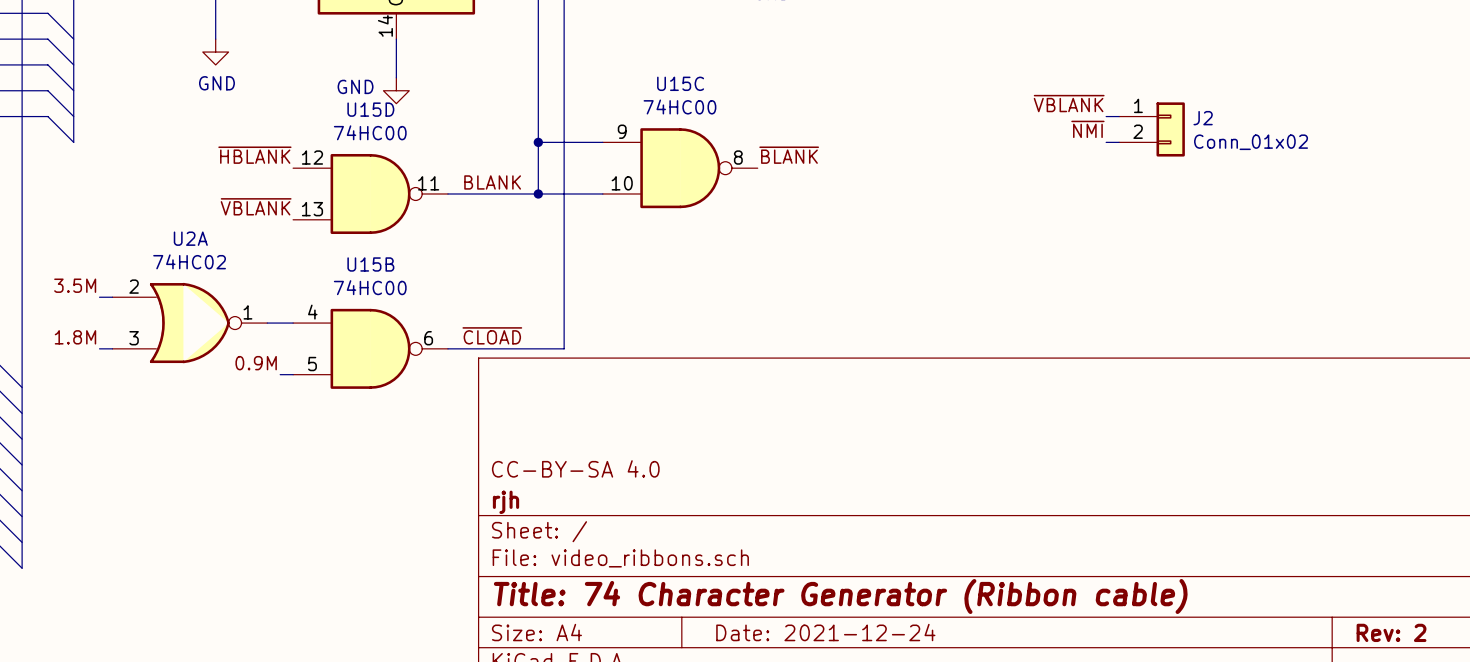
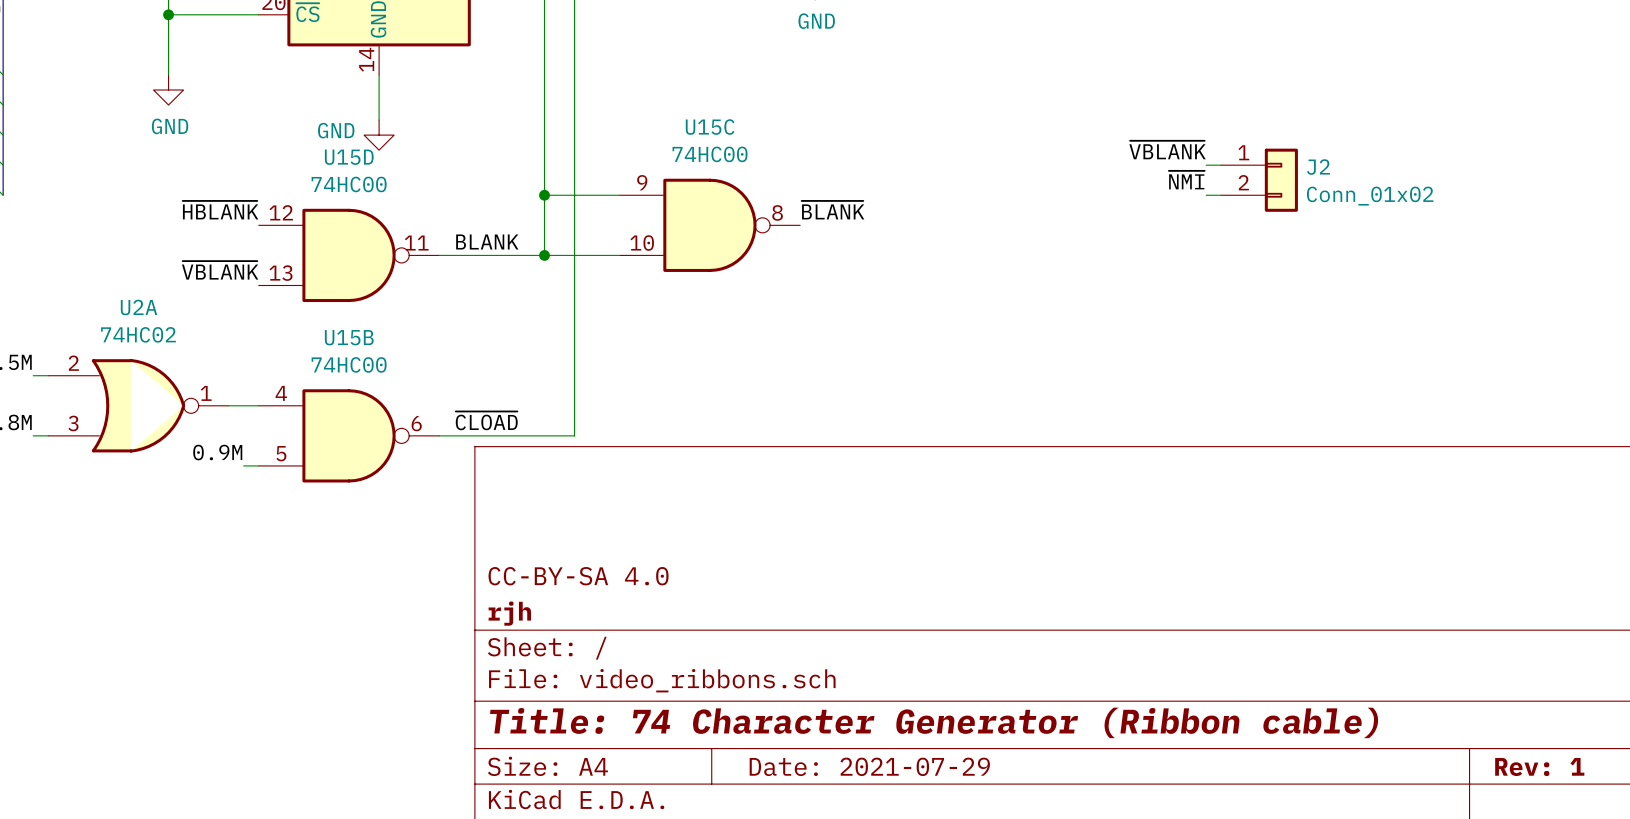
title block: Date: 2021-12-24 (825, 632) -> Date: 2021-07-29 (869, 766)
title block: Rev: 2 (1391, 632) -> Rev: 1 (1539, 766)

